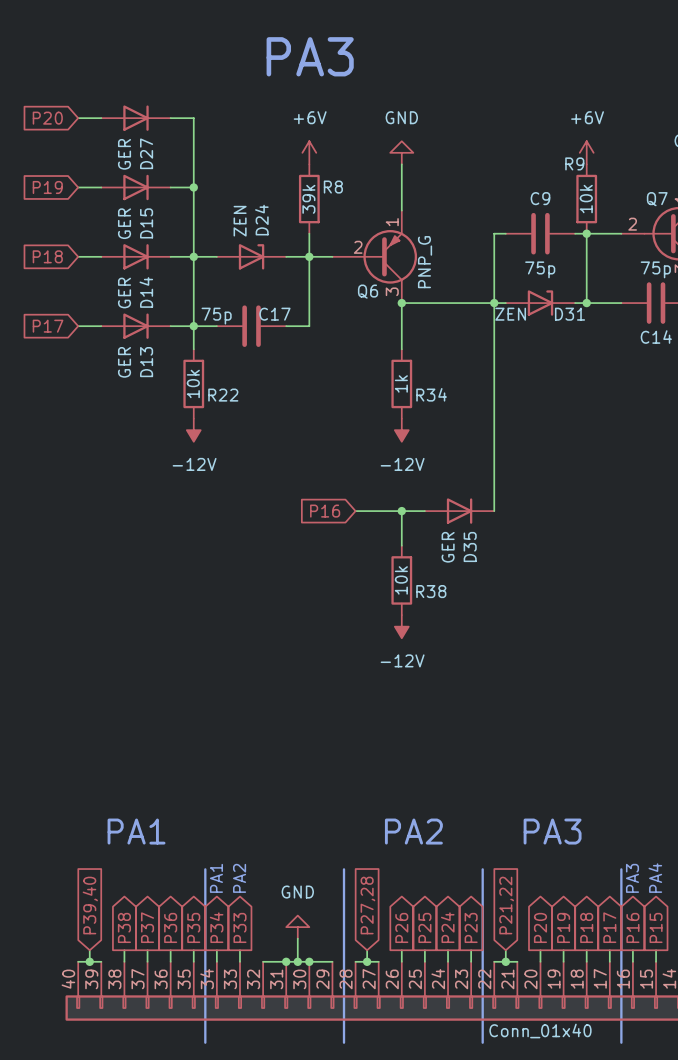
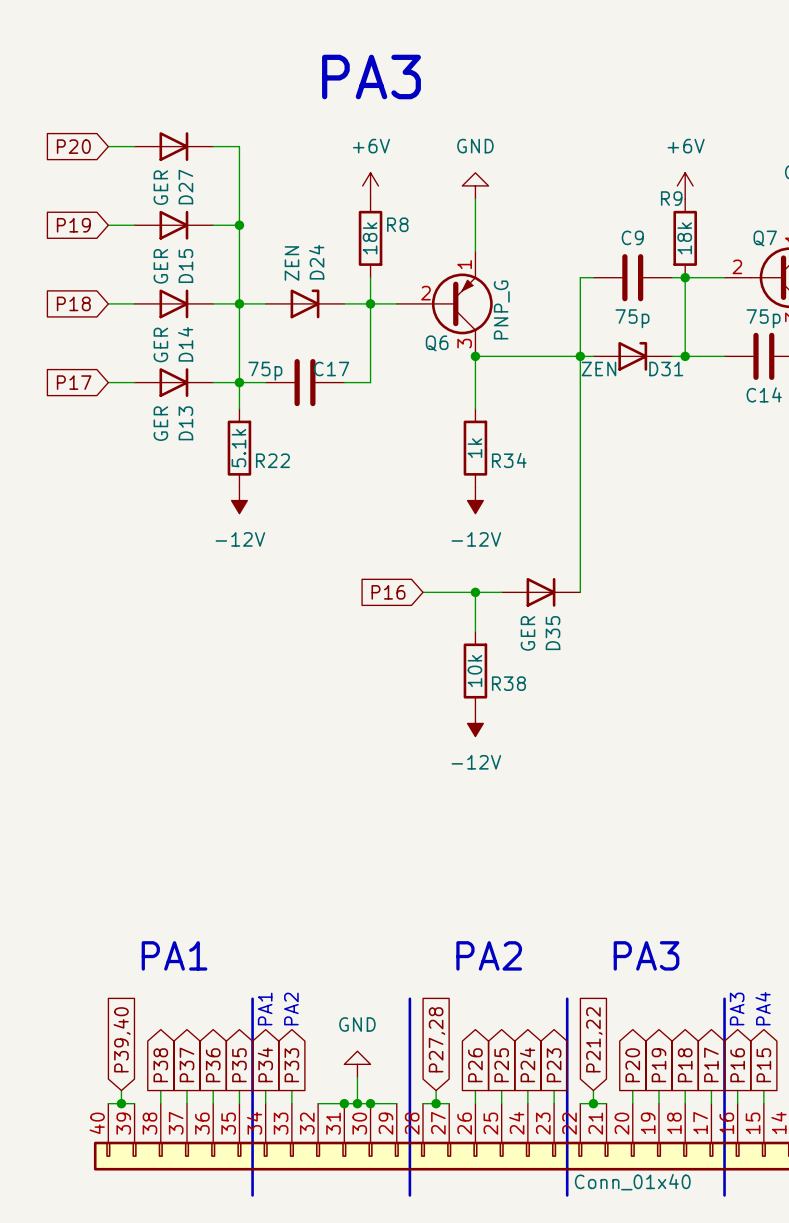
R8 value: 39k (308, 199) -> 18k (370, 238)
R9 value: 10k (586, 199) -> 18k (684, 238)
R22 value: 10k (193, 383) -> 5.1k (238, 448)

